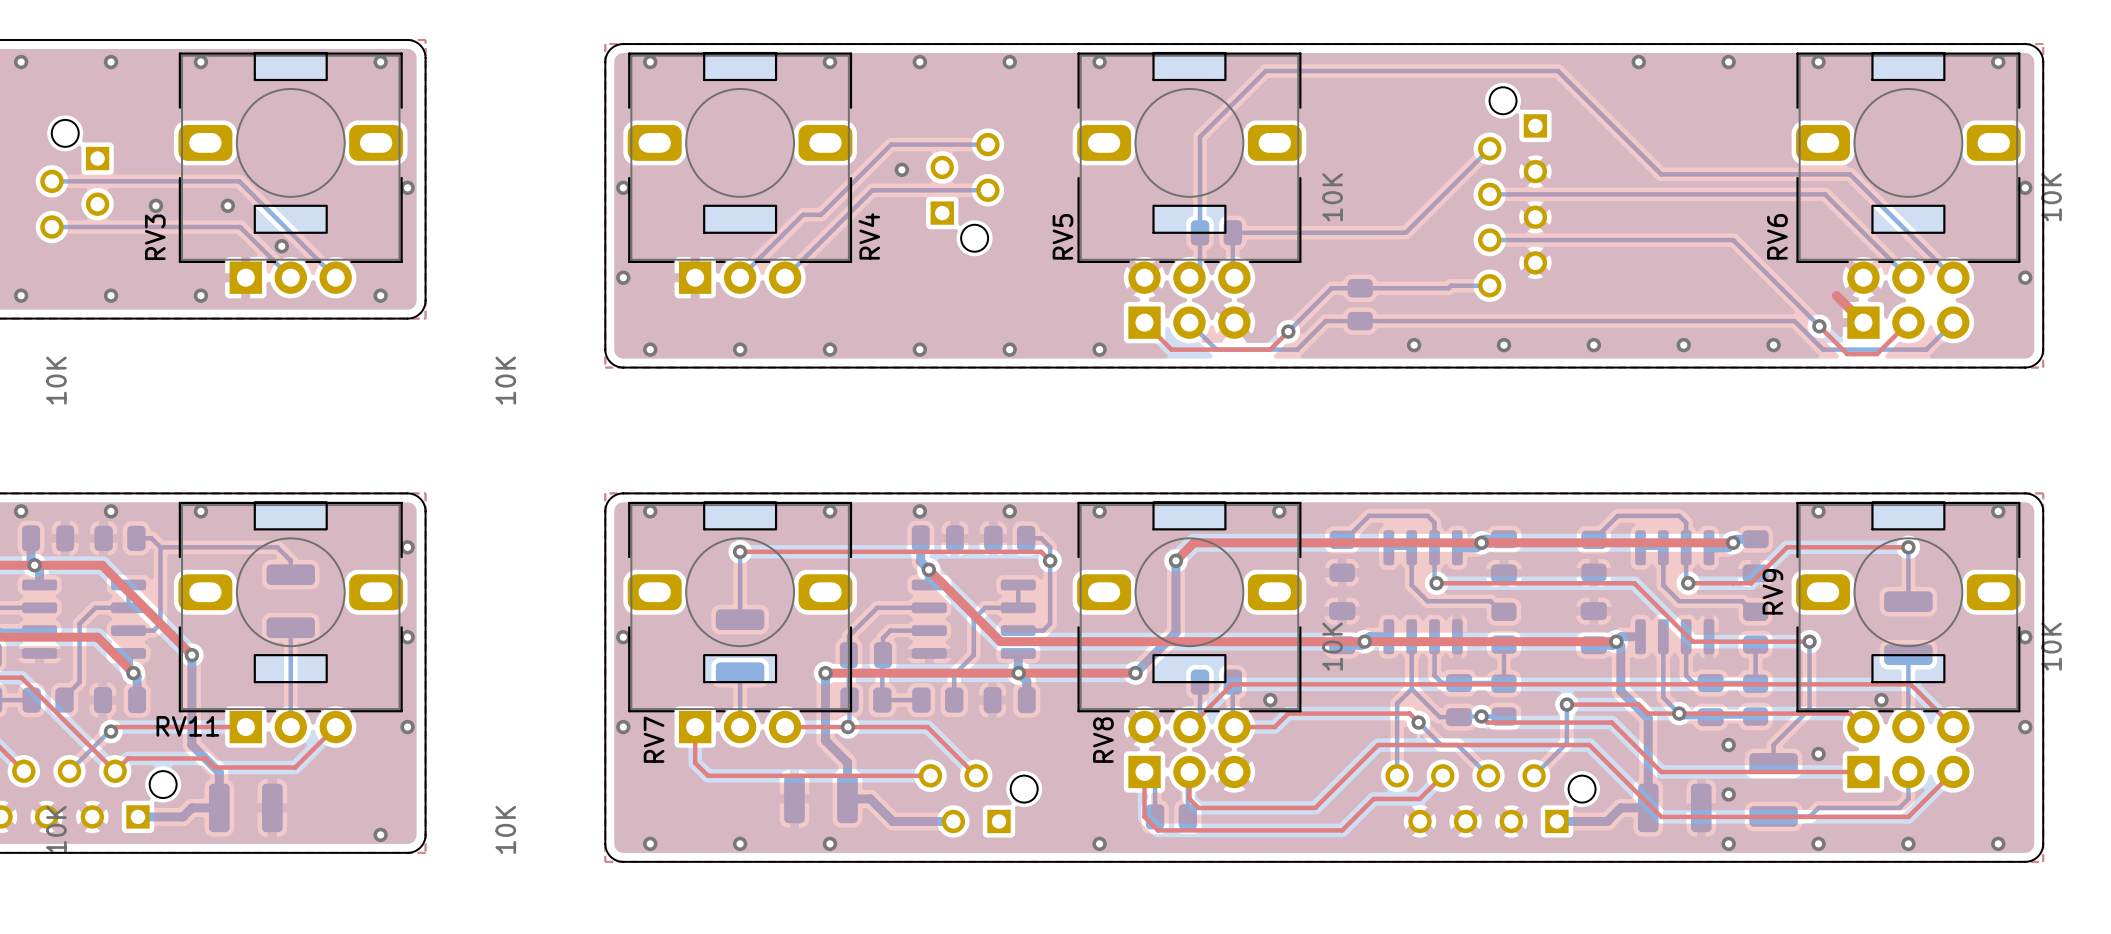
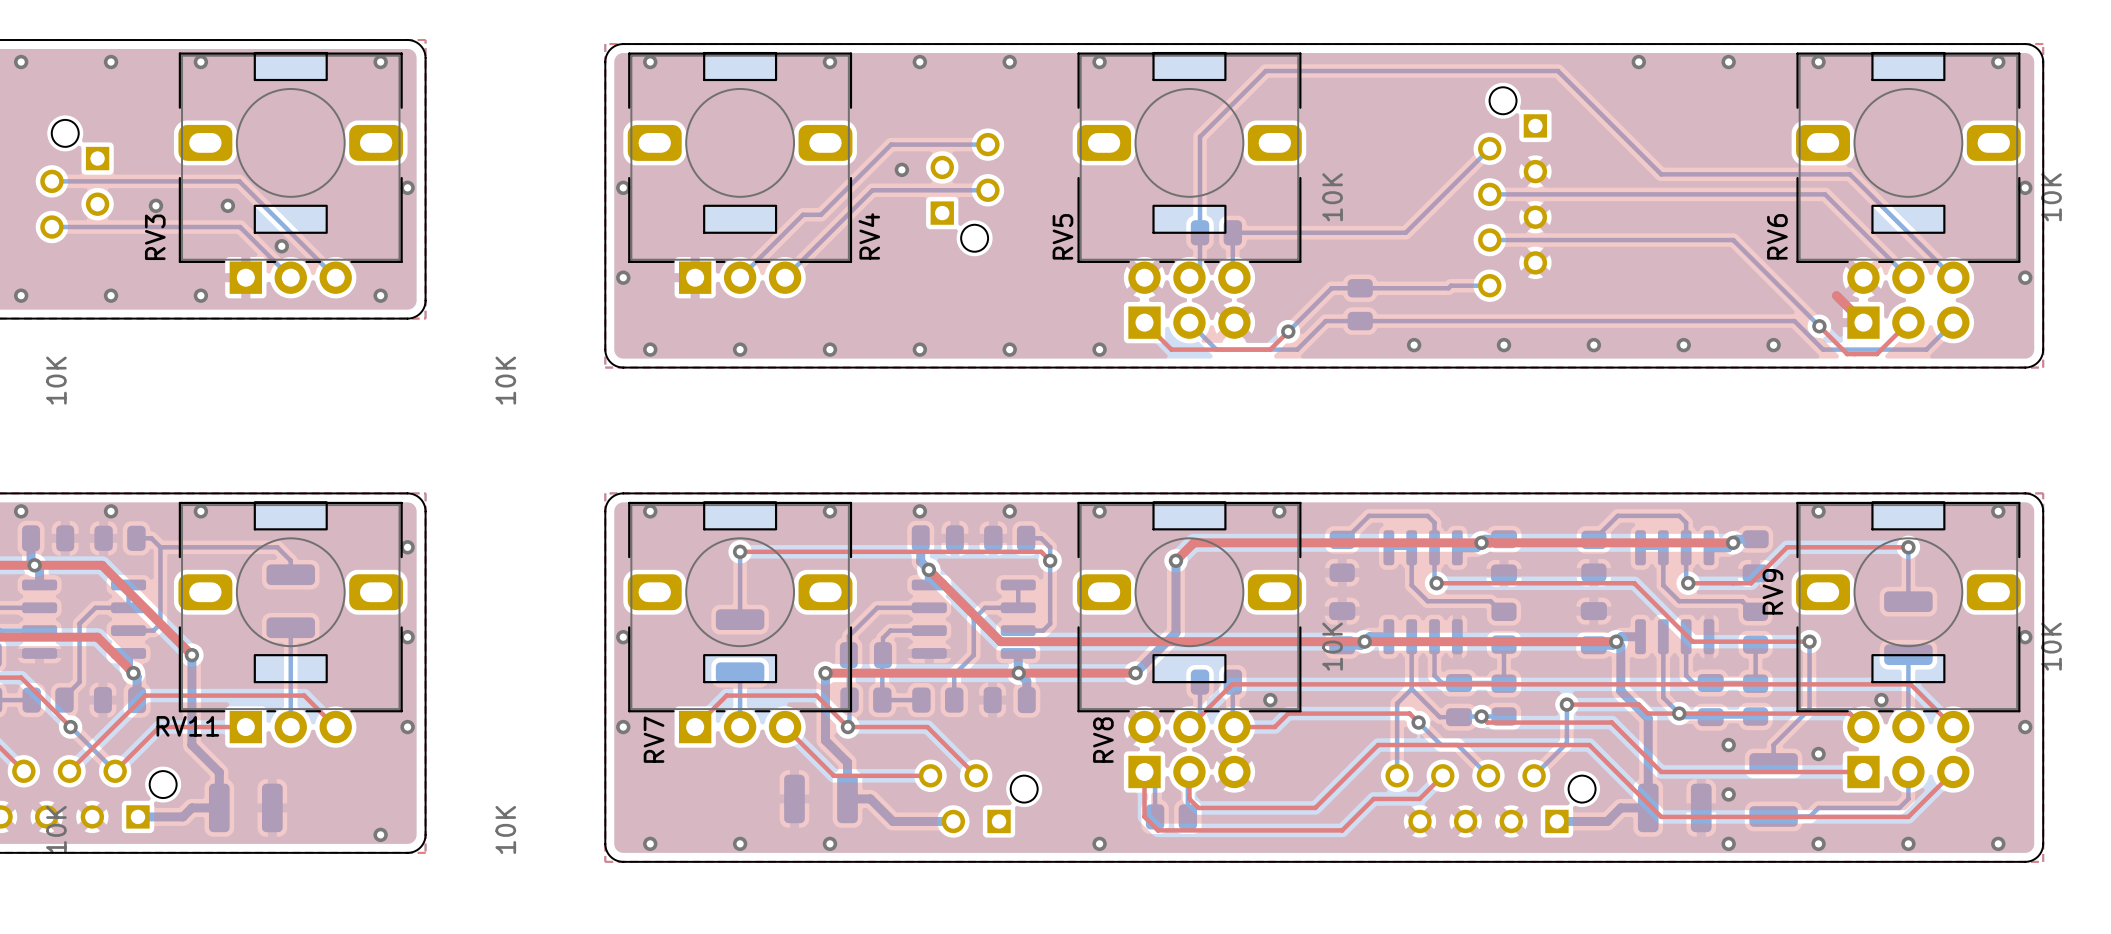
top track: (21, 677) (115, 771) -> (21, 677) (70, 727)
bottom track: none -> (70, 727) (115, 771)
top track: (159, 727) (115, 727) (111, 731) -> (159, 727) (127, 758)
top track: (335, 727) (295, 767) (214, 767) (205, 758) (127, 758) -> (335, 727) (304, 695) (145, 695) (69, 771)
top track: (695, 727) (695, 763) (707, 775) (833, 775) -> (695, 727) (726, 695) (816, 695) (847, 727)
top track: (785, 727) (847, 727) -> (785, 727) (833, 775)
bottom track: (111, 731) (69, 771) -> none
via position: (111, 731) -> (70, 727)

